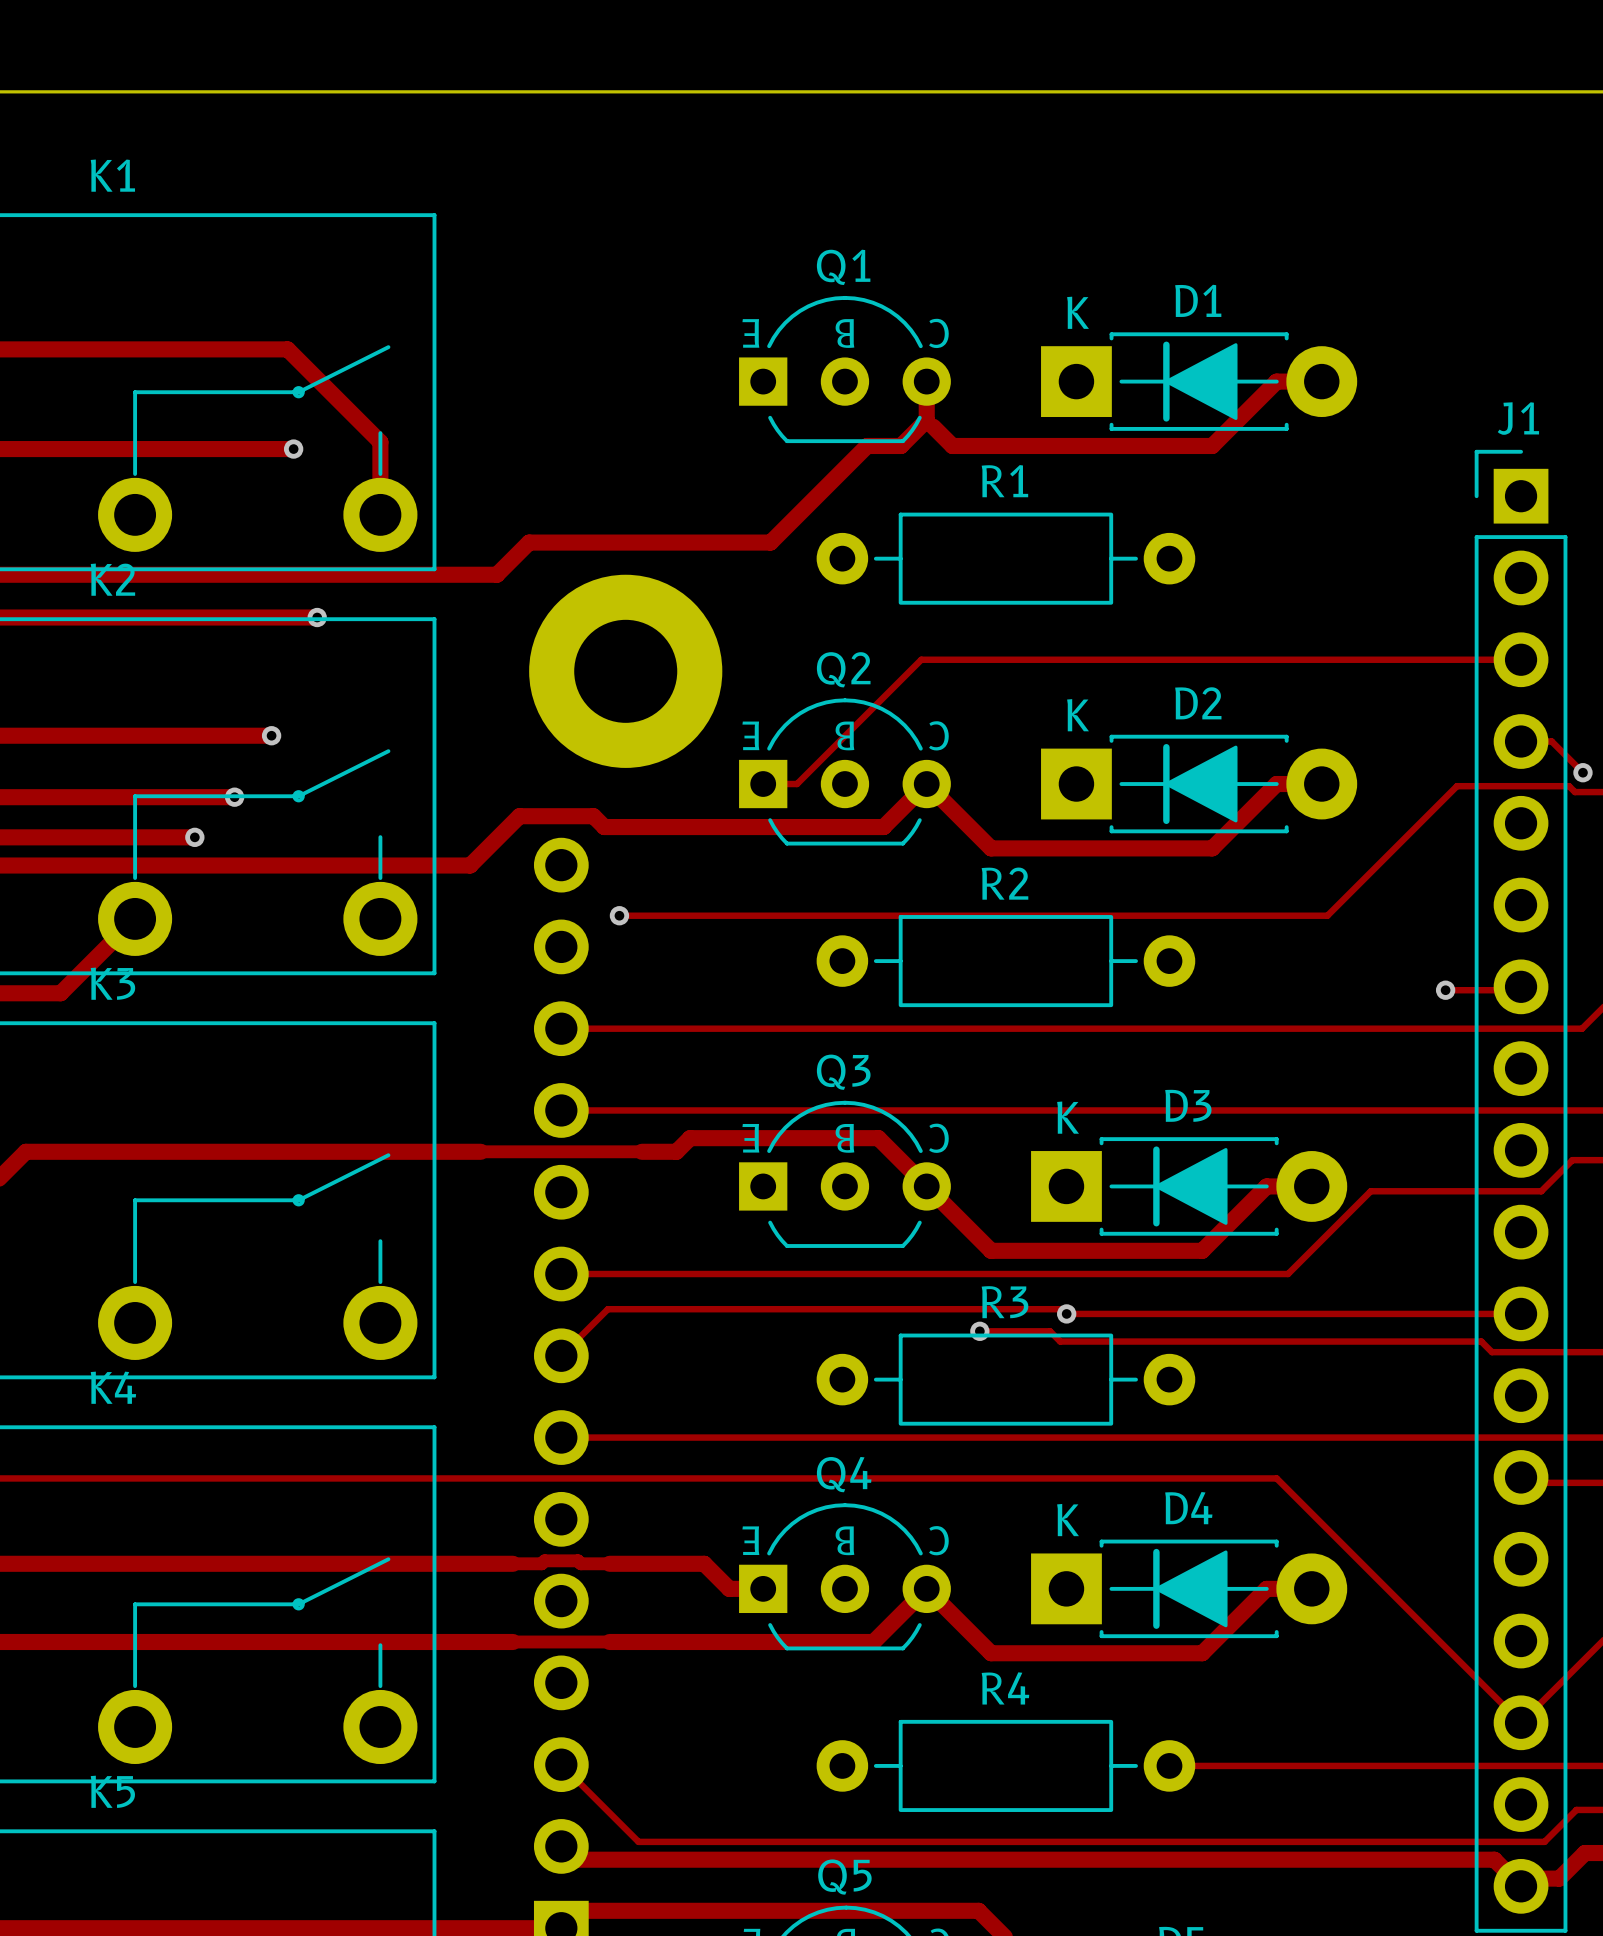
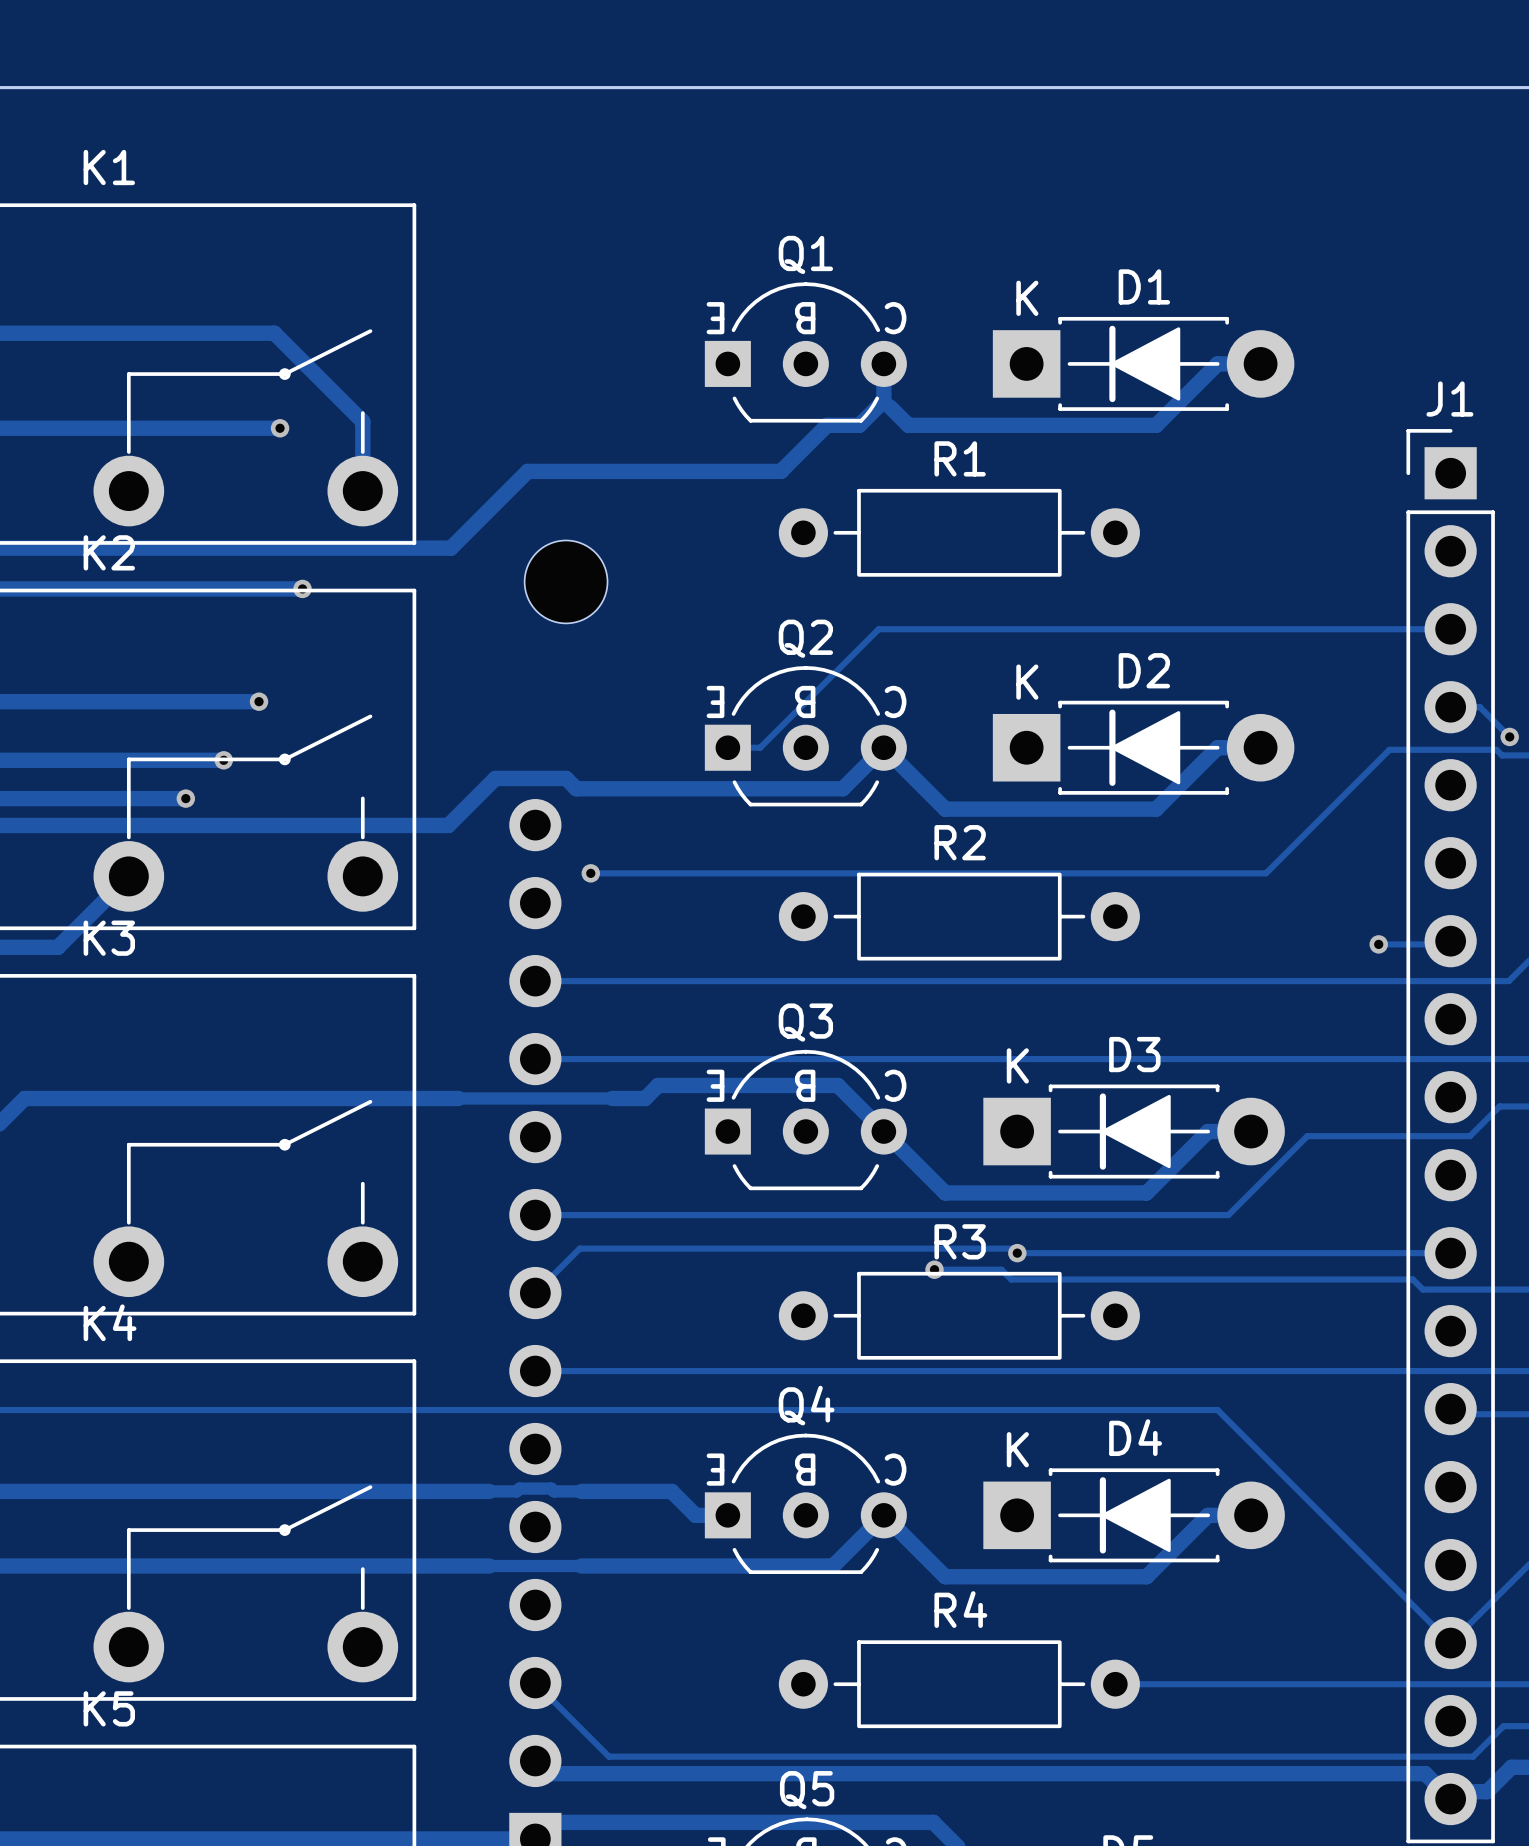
track: (818, 494) (770, 542) (529, 542) (496, 574) (472, 574) -> (780, 471) (527, 471) (450, 548)
part: none -> (566, 581)
part: (625, 671) -> none

